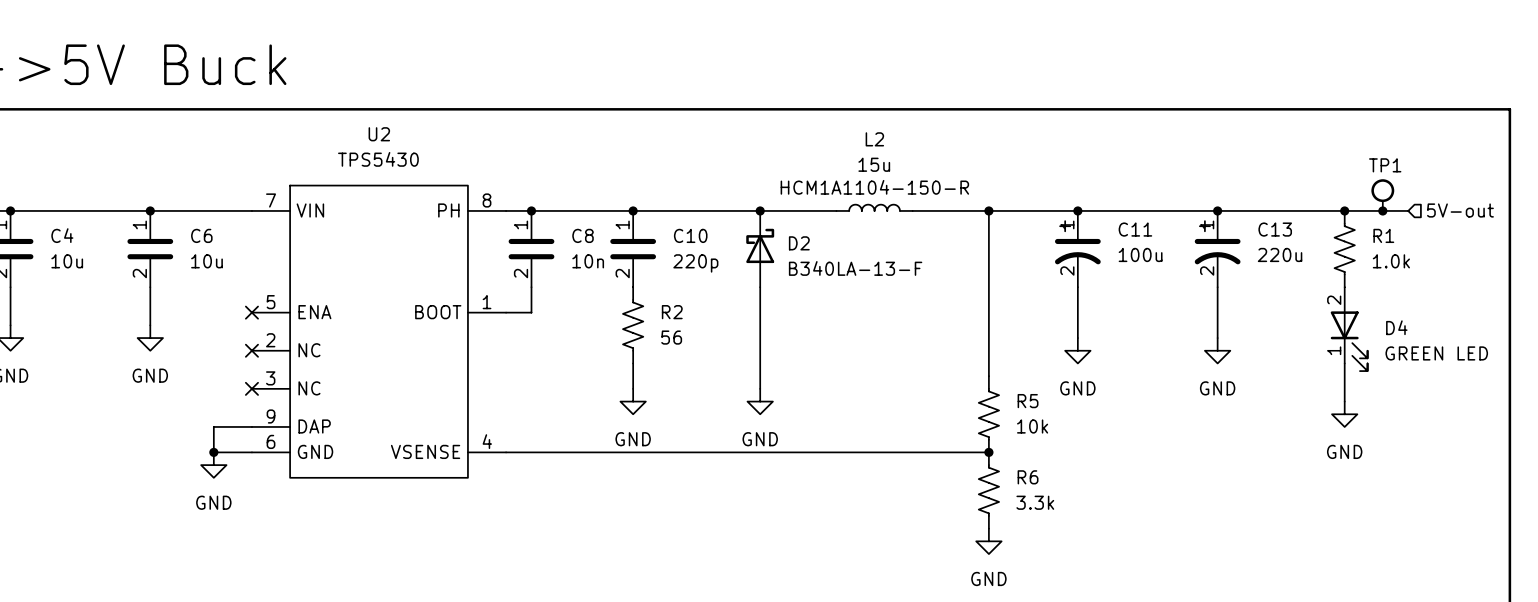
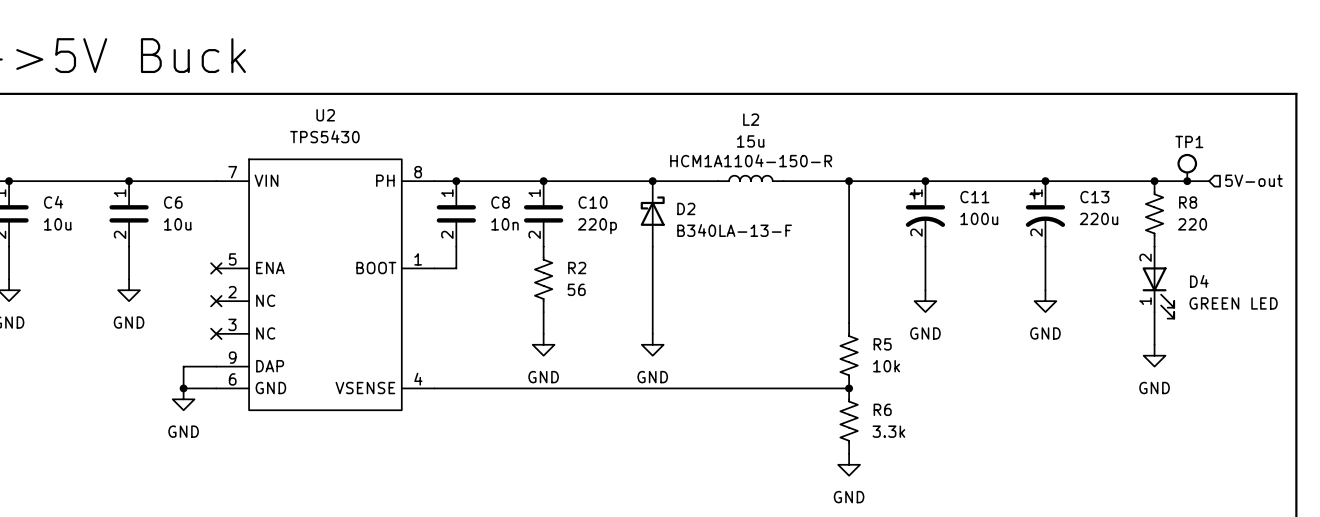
R1 name: R1 (1383, 235) -> R8 (1188, 202)
R1 value: 1.0k (1391, 261) -> 220 (1192, 224)

